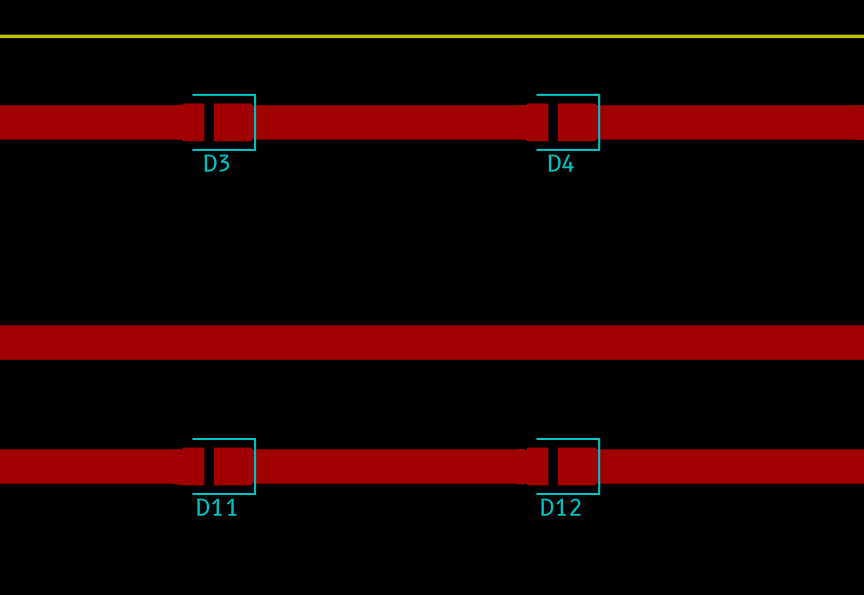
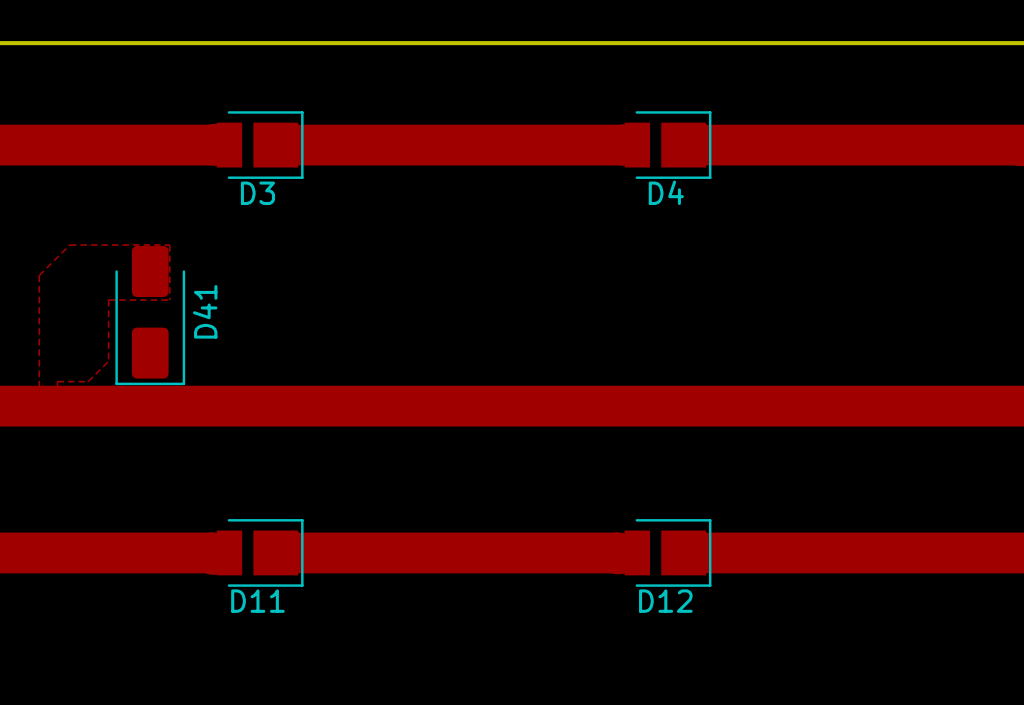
zone outline: none -> (69, 245) (169, 245) (169, 300) (108, 300) (108, 361) (88, 381) (57, 381) (57, 414) (39, 414) (39, 275) (69, 245)
D41: none -> (150, 315)

